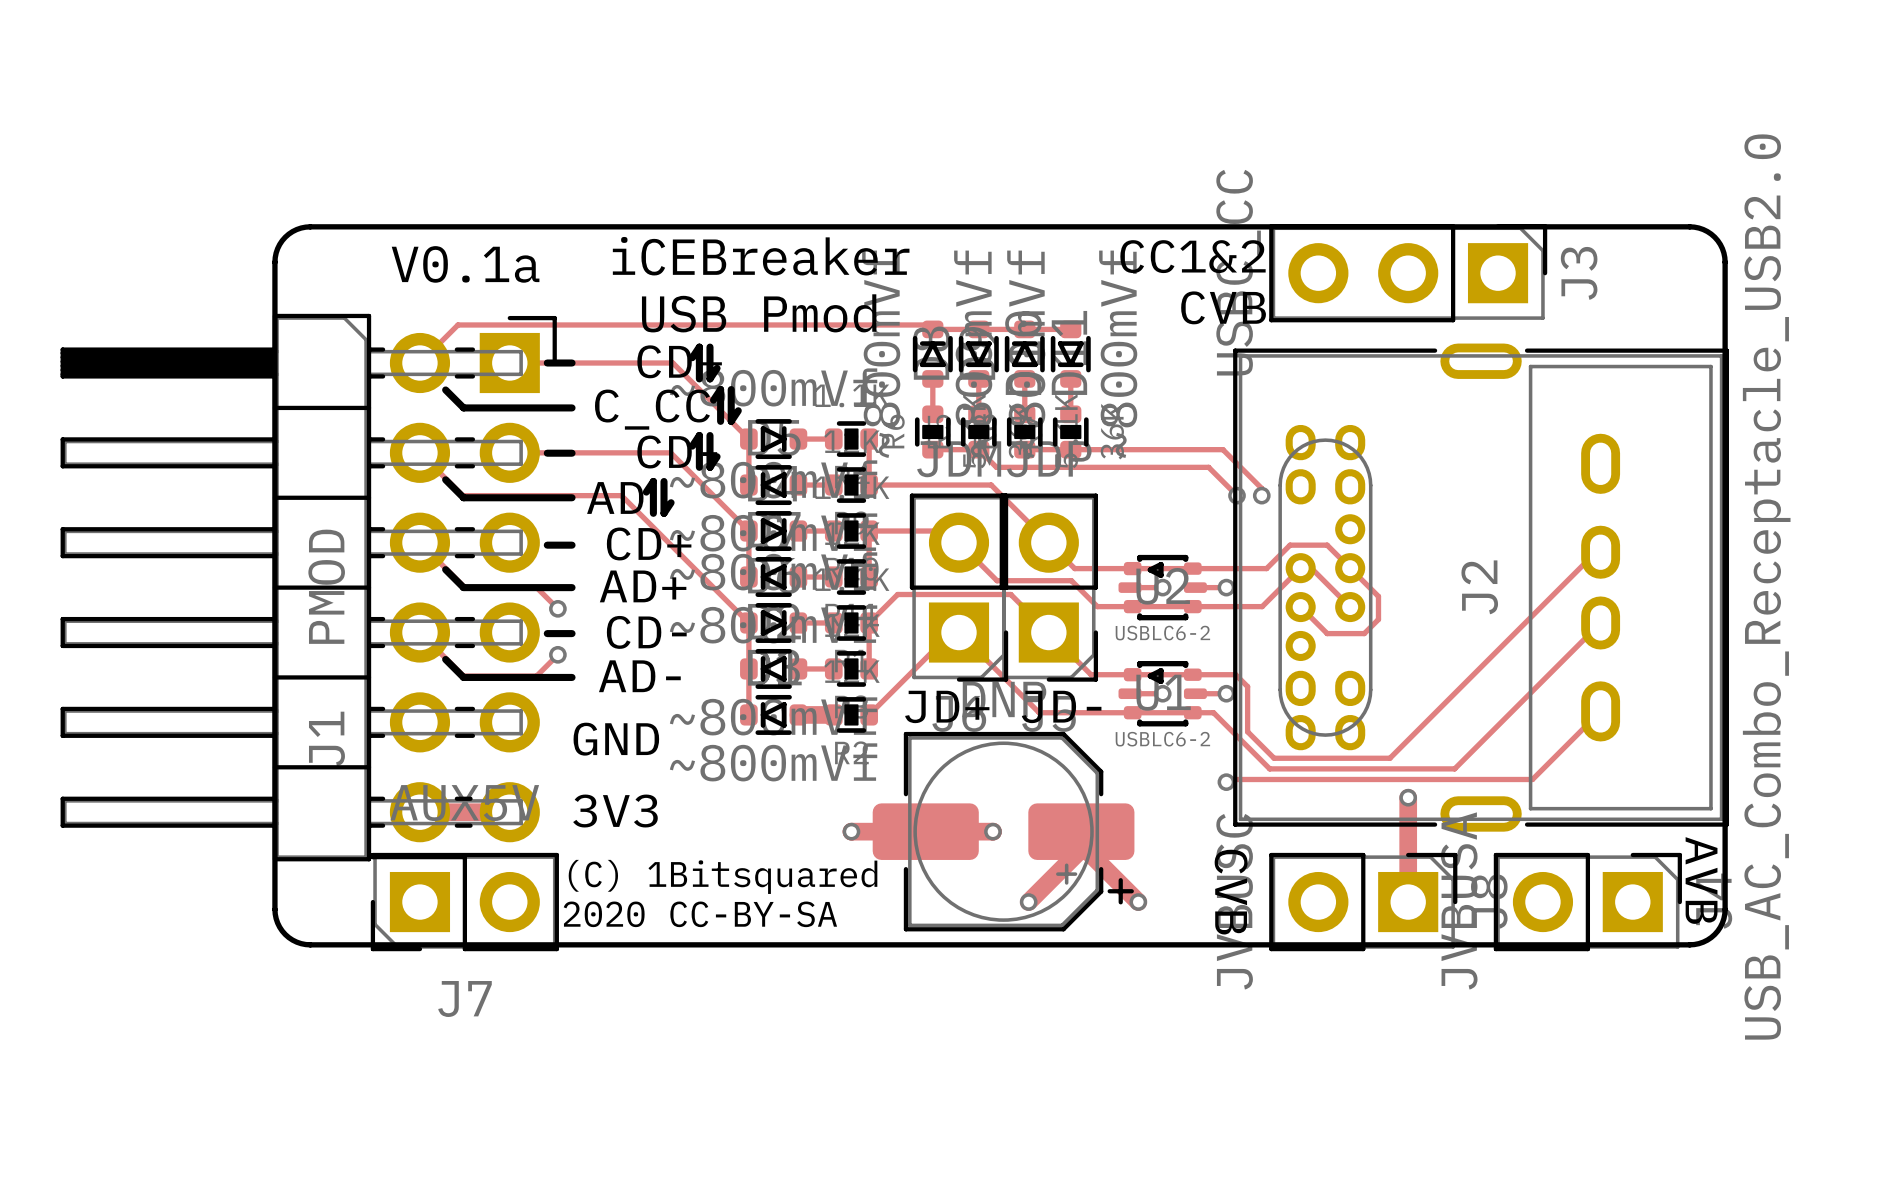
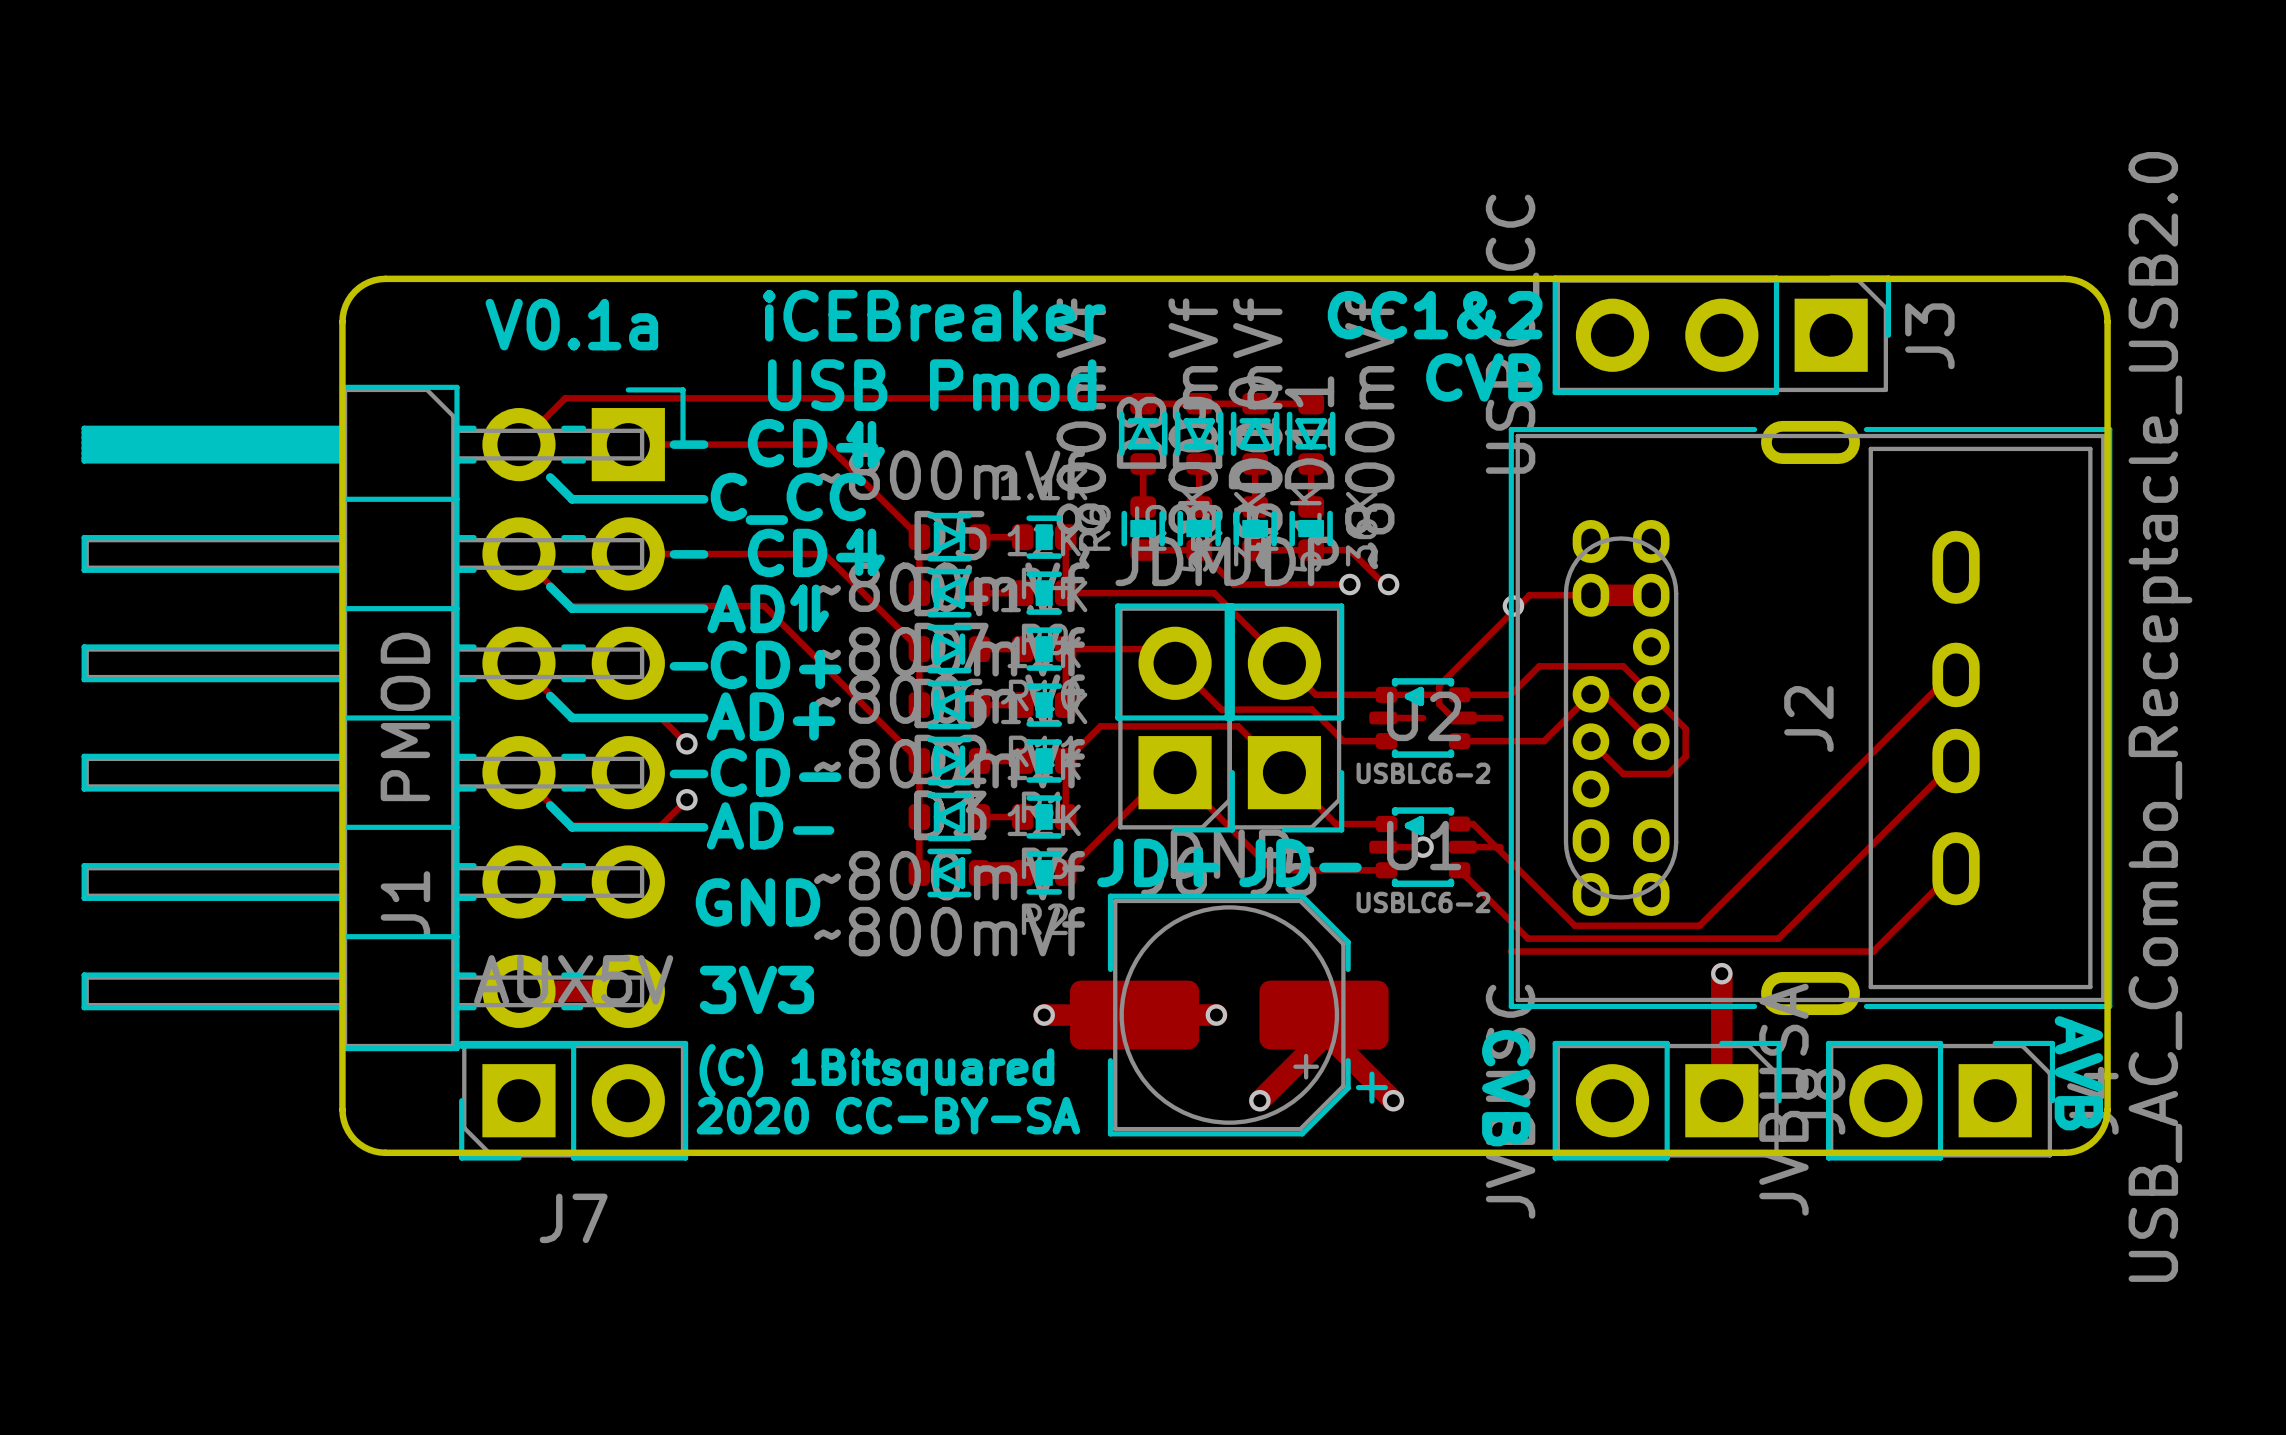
line: (731, 389) (731, 421) (738, 410) -> none
line: (713, 400) (720, 389) (720, 421) -> none
track: (1102, 449) (1222, 449) (1261, 488) (1261, 495) -> (1349, 550) (1384, 584) (1388, 584)
track: (996, 467) (1208, 467) (1237, 495) -> (1220, 571) (1233, 584) (1349, 584)
via: none -> (1349, 584)
via: none -> (1388, 584)
track: none -> (1651, 595) (1529, 595) (1439, 685) (1439, 704) (1453, 717)
via: (1261, 495) -> none
track: (1290, 545) (1266, 568) (1234, 568) -> (1578, 666) (1539, 666) (1510, 694)
via: (1162, 587) -> none
via: (1226, 587) -> none
track: (1132, 606) (1192, 606) -> none
track: (1132, 674) (1192, 674) -> none
track: (1203, 674) (1235, 674) (1247, 686) (1247, 731) (1274, 758) (1287, 758) -> (1473, 823) (1574, 925)
via: (1226, 693) -> none
track: (1132, 712) (1213, 712) (1269, 768) -> (1459, 870) (1527, 938) (1553, 938)
via: (1226, 782) -> none

